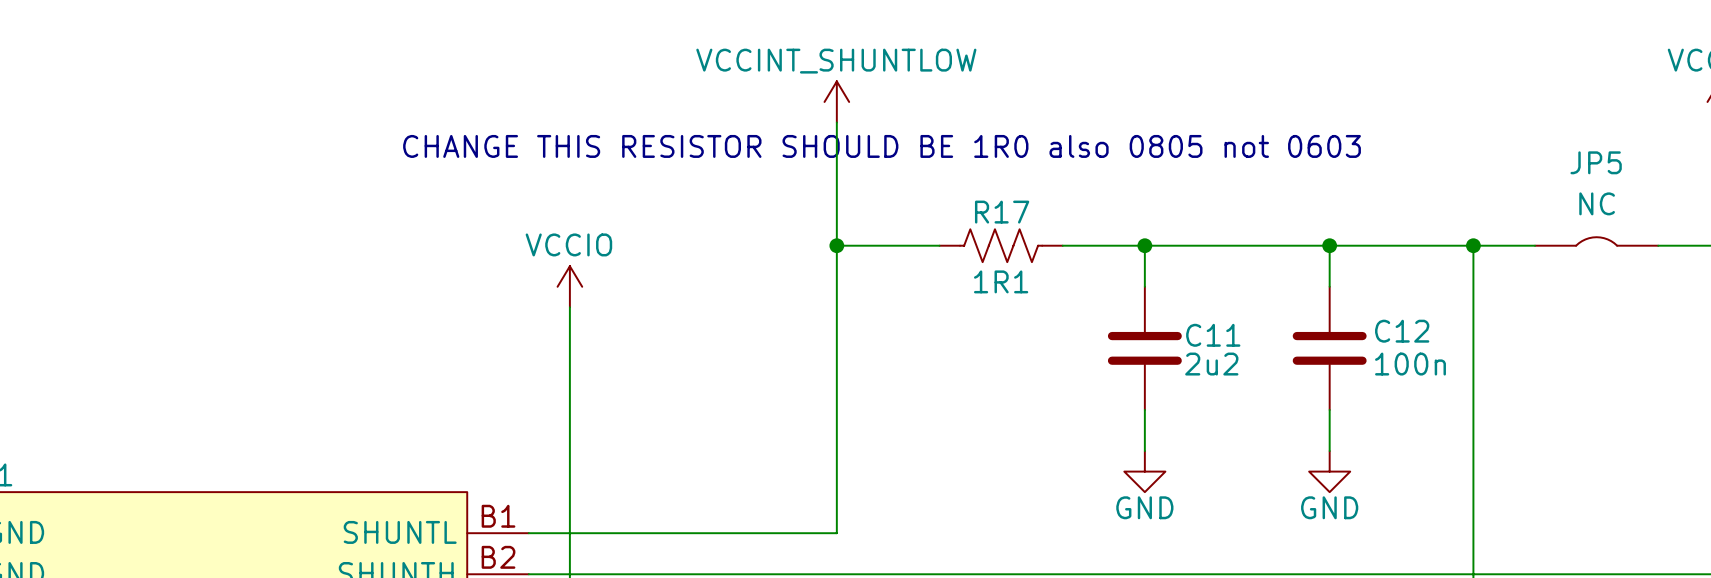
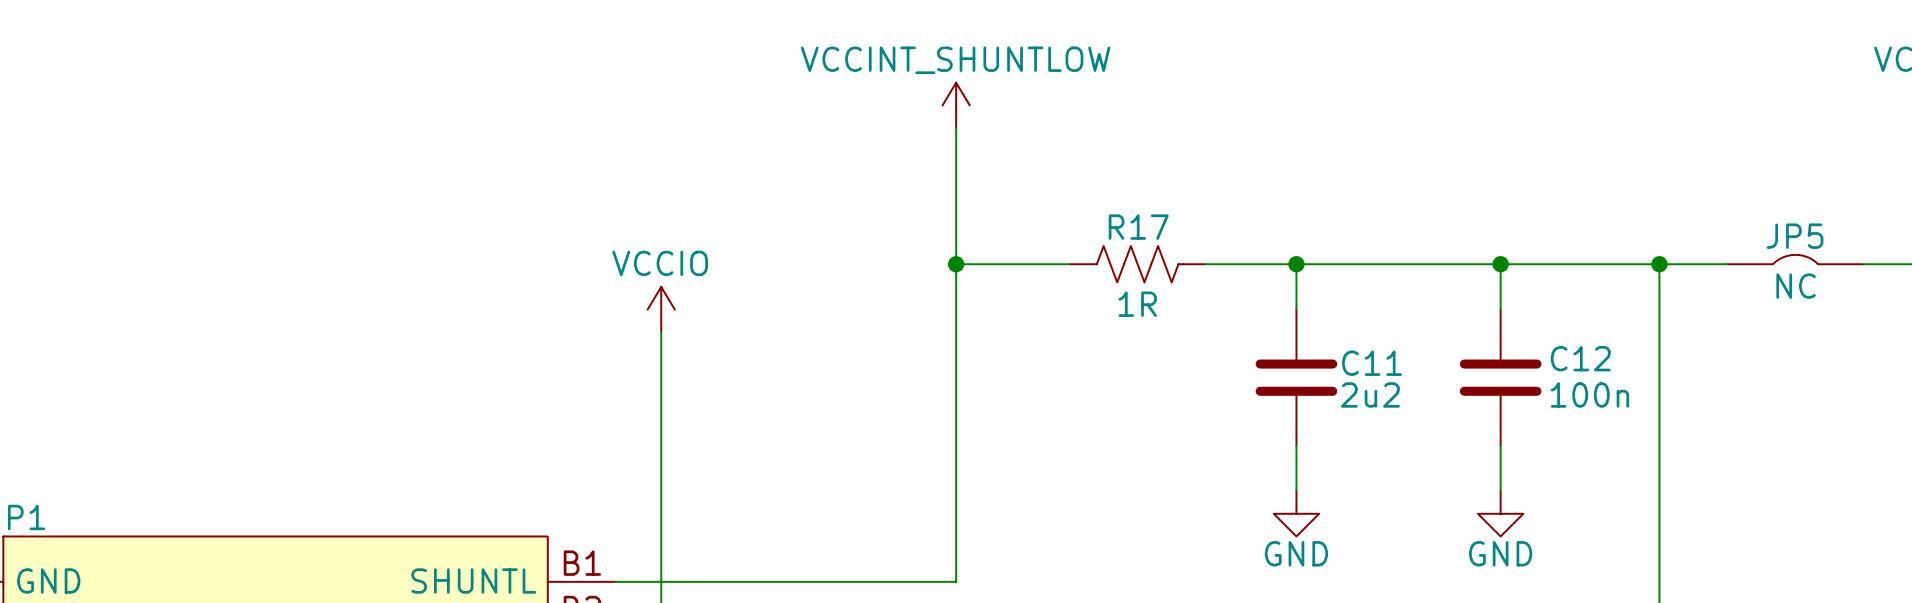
text: CHANGE THIS RESISTOR SHOULD BE 1R0 also 0805 not 0603 (882, 146) -> none
JP5 name position: JP5 (1596, 162) -> JP5 (1795, 236)
JP5 text position: NC (1597, 203) -> NC (1796, 286)
R17 text: 1R1 (1001, 281) -> 1R (1137, 304)

